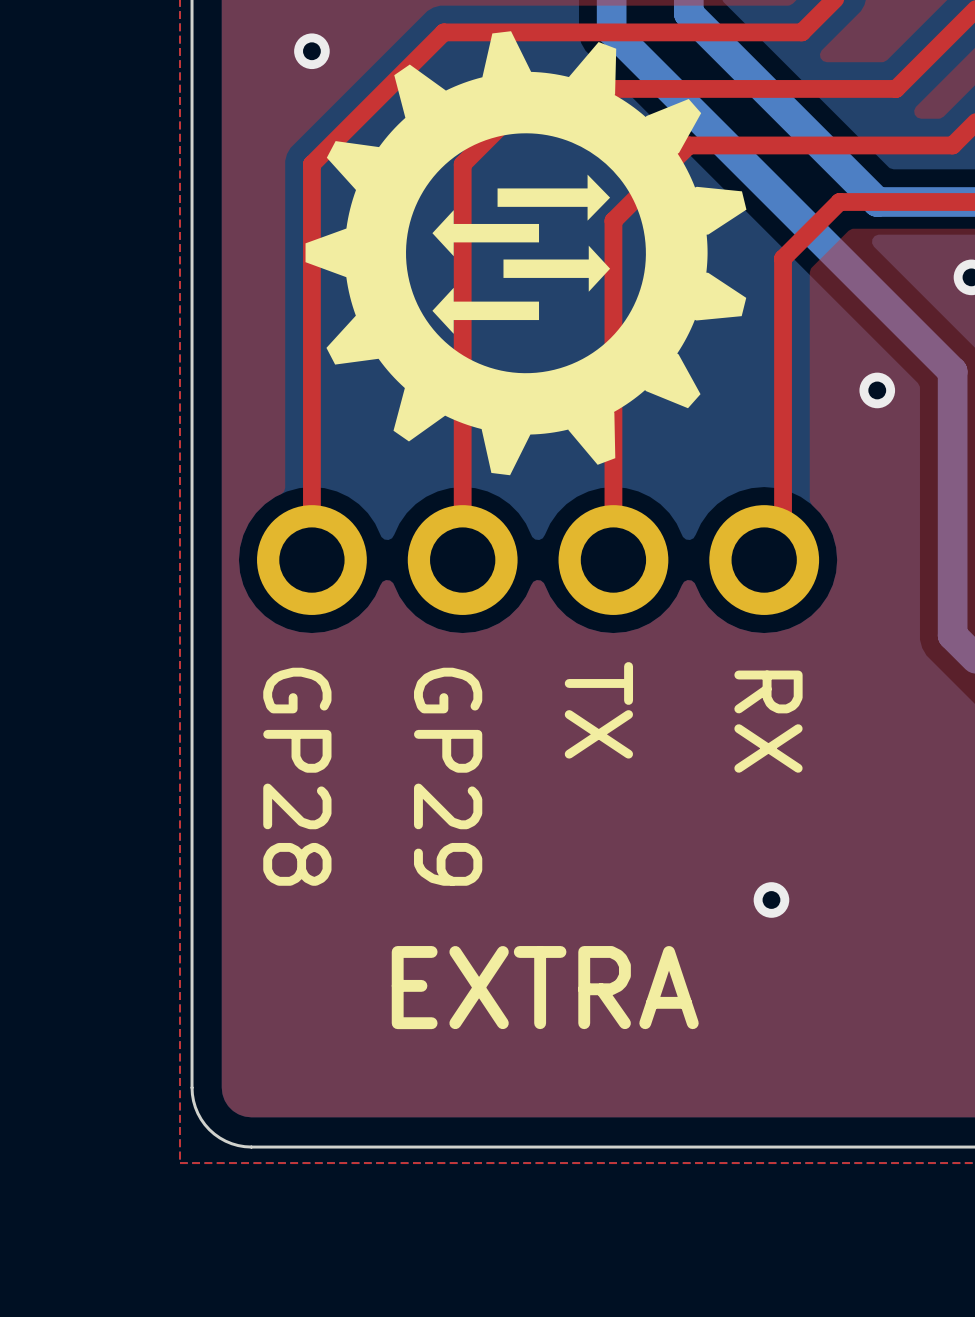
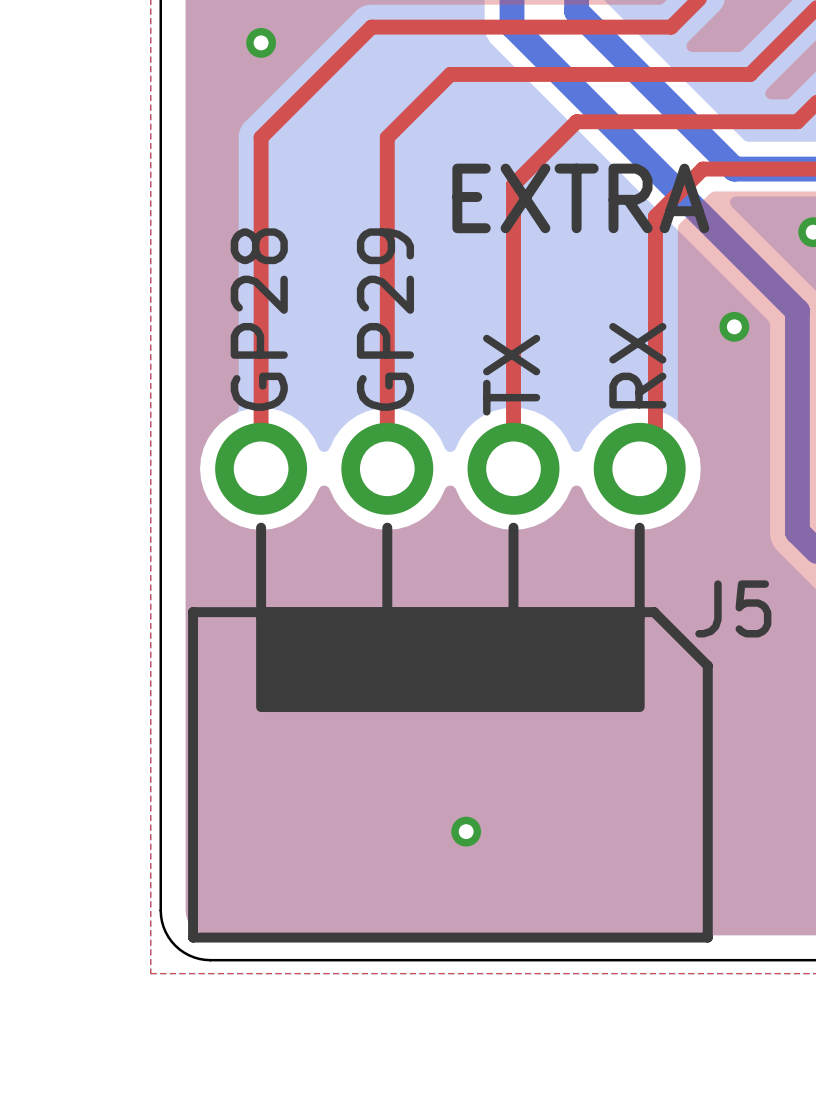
drawing: [305, 31, 747, 476] -> none
J5 side: bottom (538, 560) -> top (450, 682)
text: TX (598, 710) -> none
text: RX (768, 721) -> none
text: GP28 (297, 776) -> none
text: GP29 (448, 776) -> none
via position: (771, 899) -> (466, 831)
text: EXTRA (545, 987) -> none

